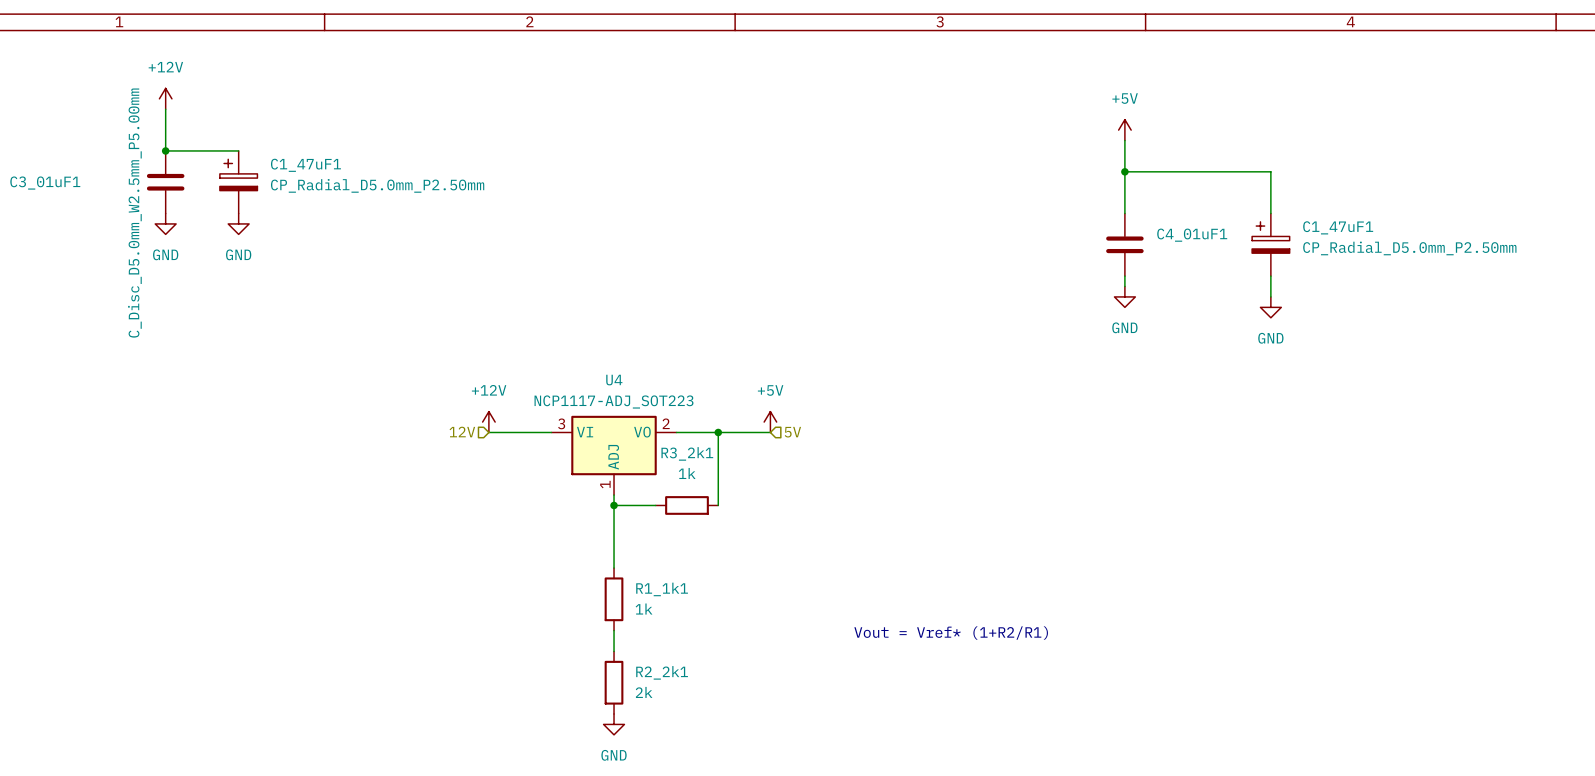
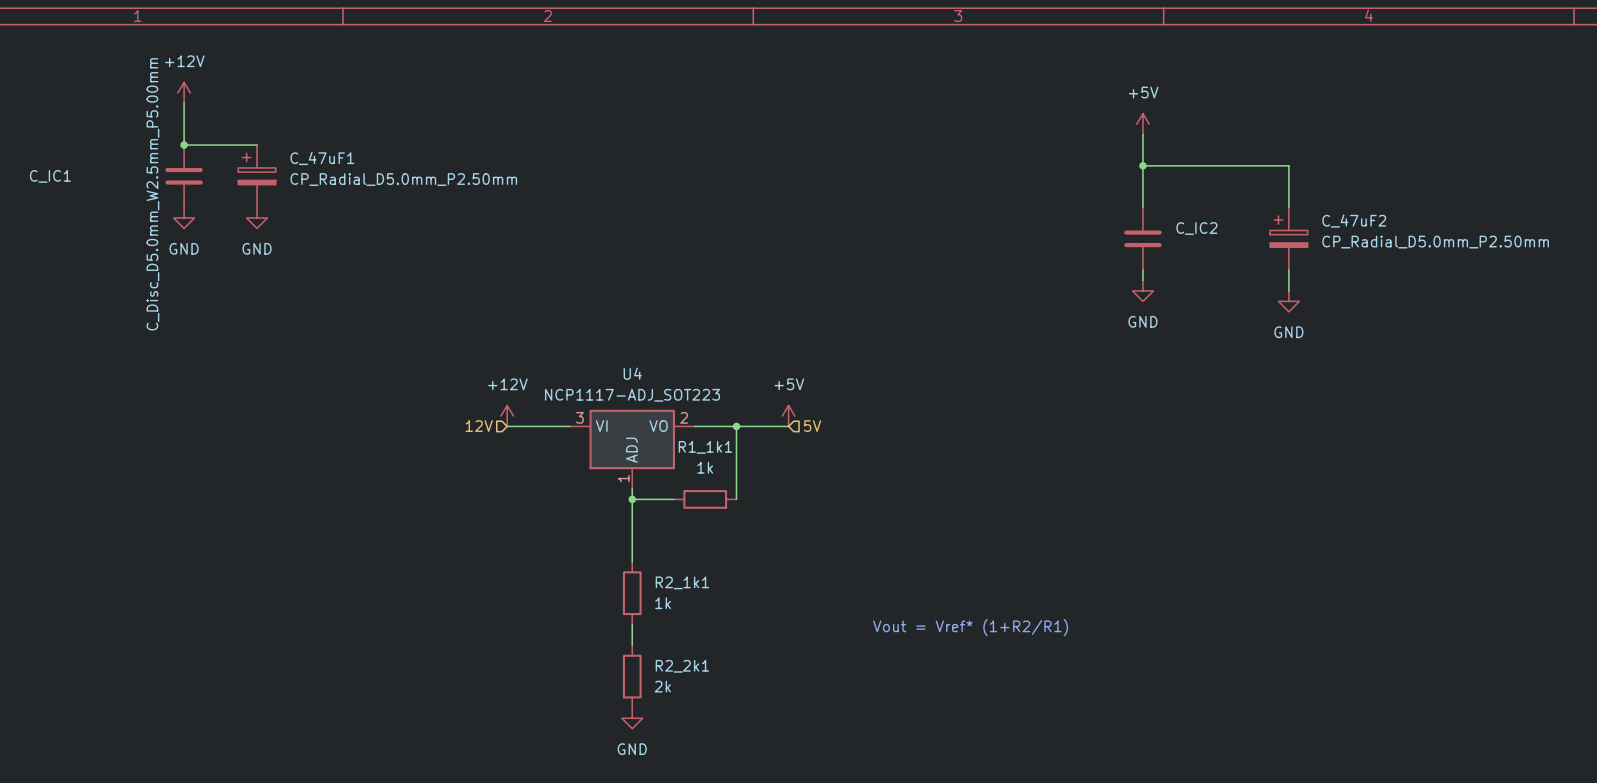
C1_47uF1 name: C1_47uF1 (305, 165) -> C_47uF1 (322, 158)
C3_01uF1 name: C3_01uF1 (45, 183) -> C_IC1 (50, 176)
C1_47uF1 name: C1_47uF1 (1338, 227) -> C_47uF2 (1354, 220)
C4_01uF1 name: C4_01uF1 (1192, 235) -> C_IC2 (1196, 228)
R3_2k1 name: R3_2k1 (687, 453) -> R1_1k1 (705, 447)
R1_1k1 name: R1_1k1 (662, 589) -> R2_1k1 (682, 582)

